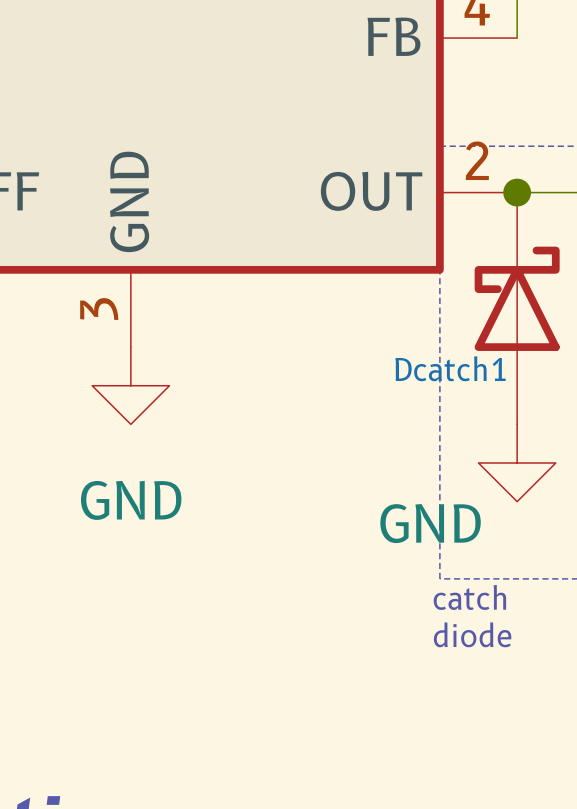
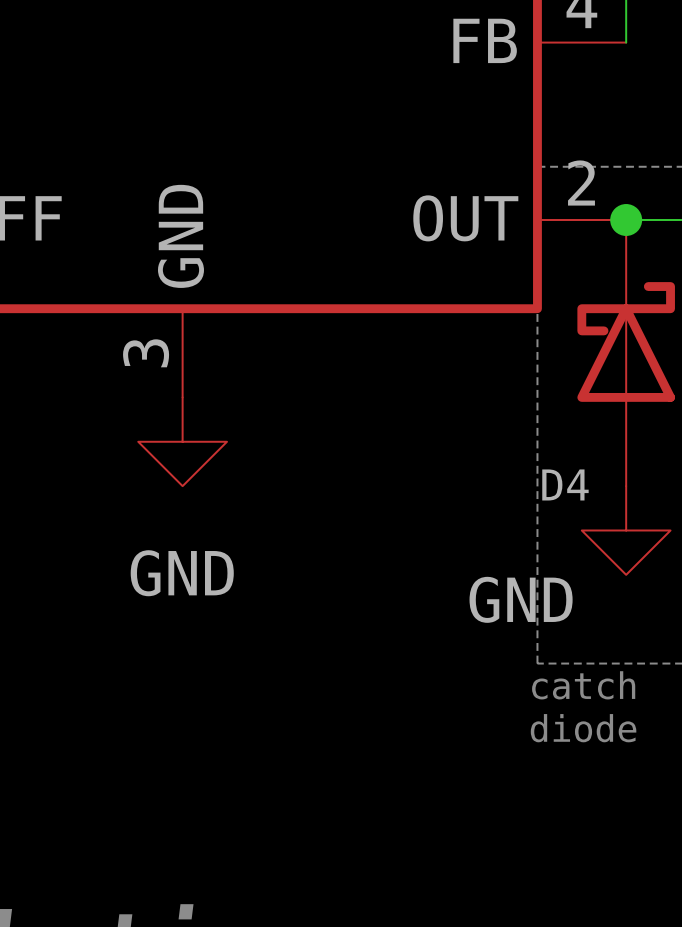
Dcatch1 name: Dcatch1 (450, 368) -> D4 (565, 484)

